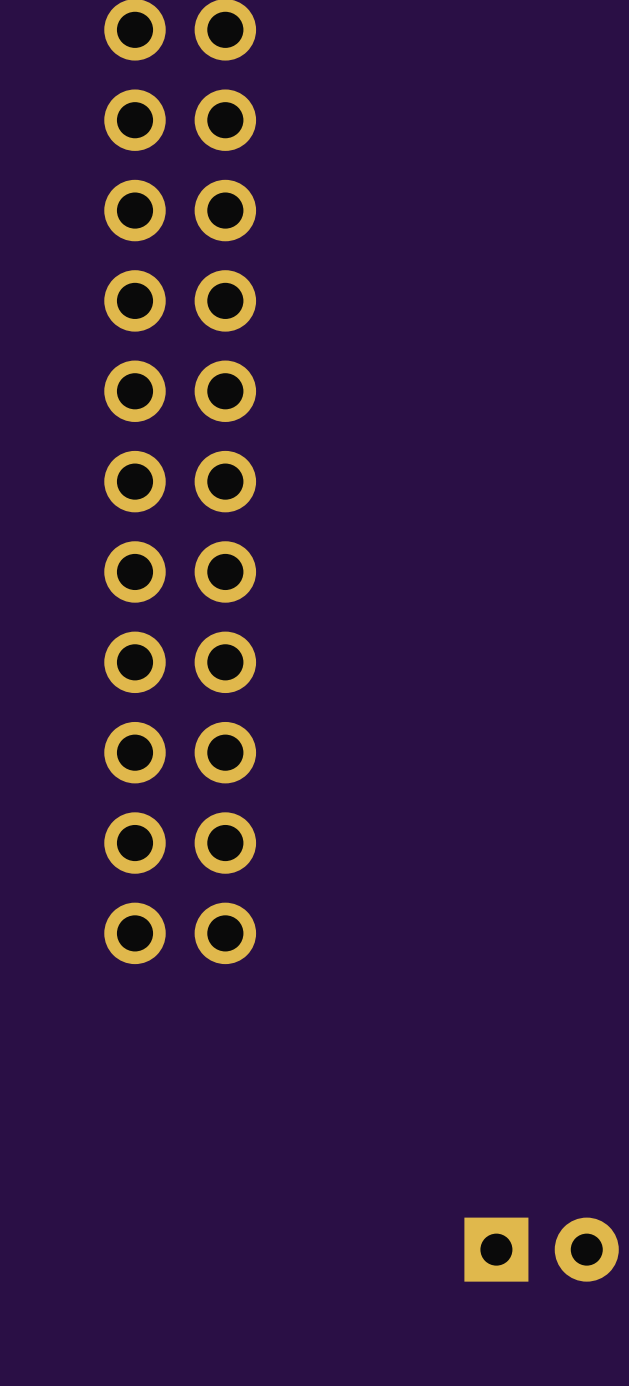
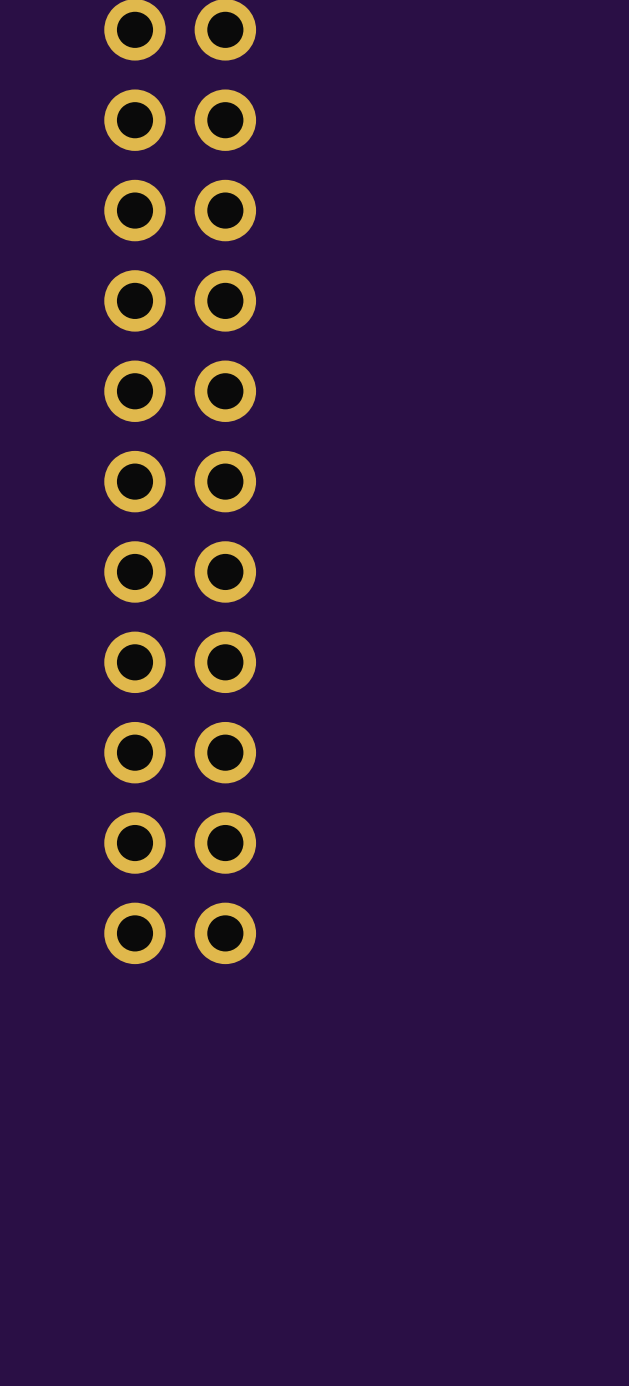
part: (541, 1249) -> none

